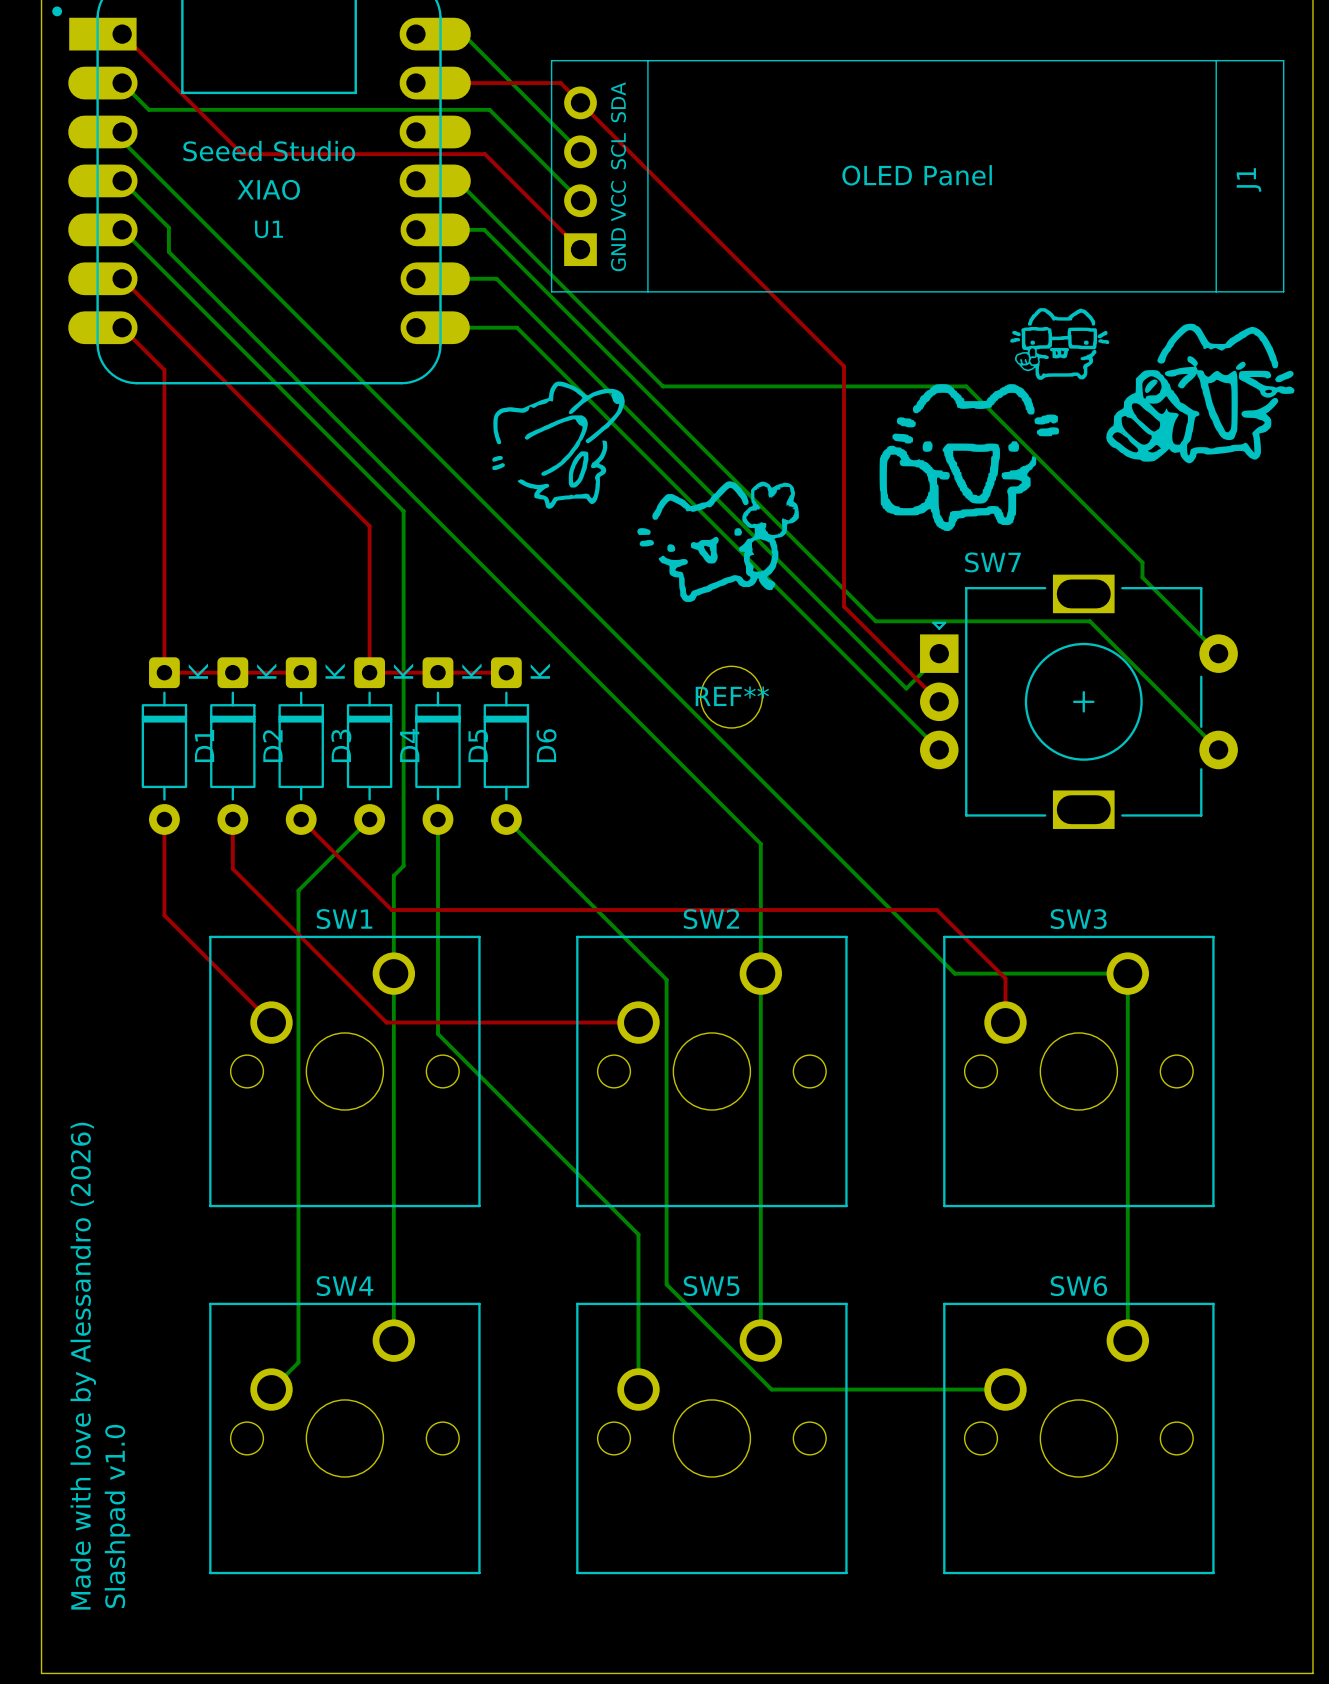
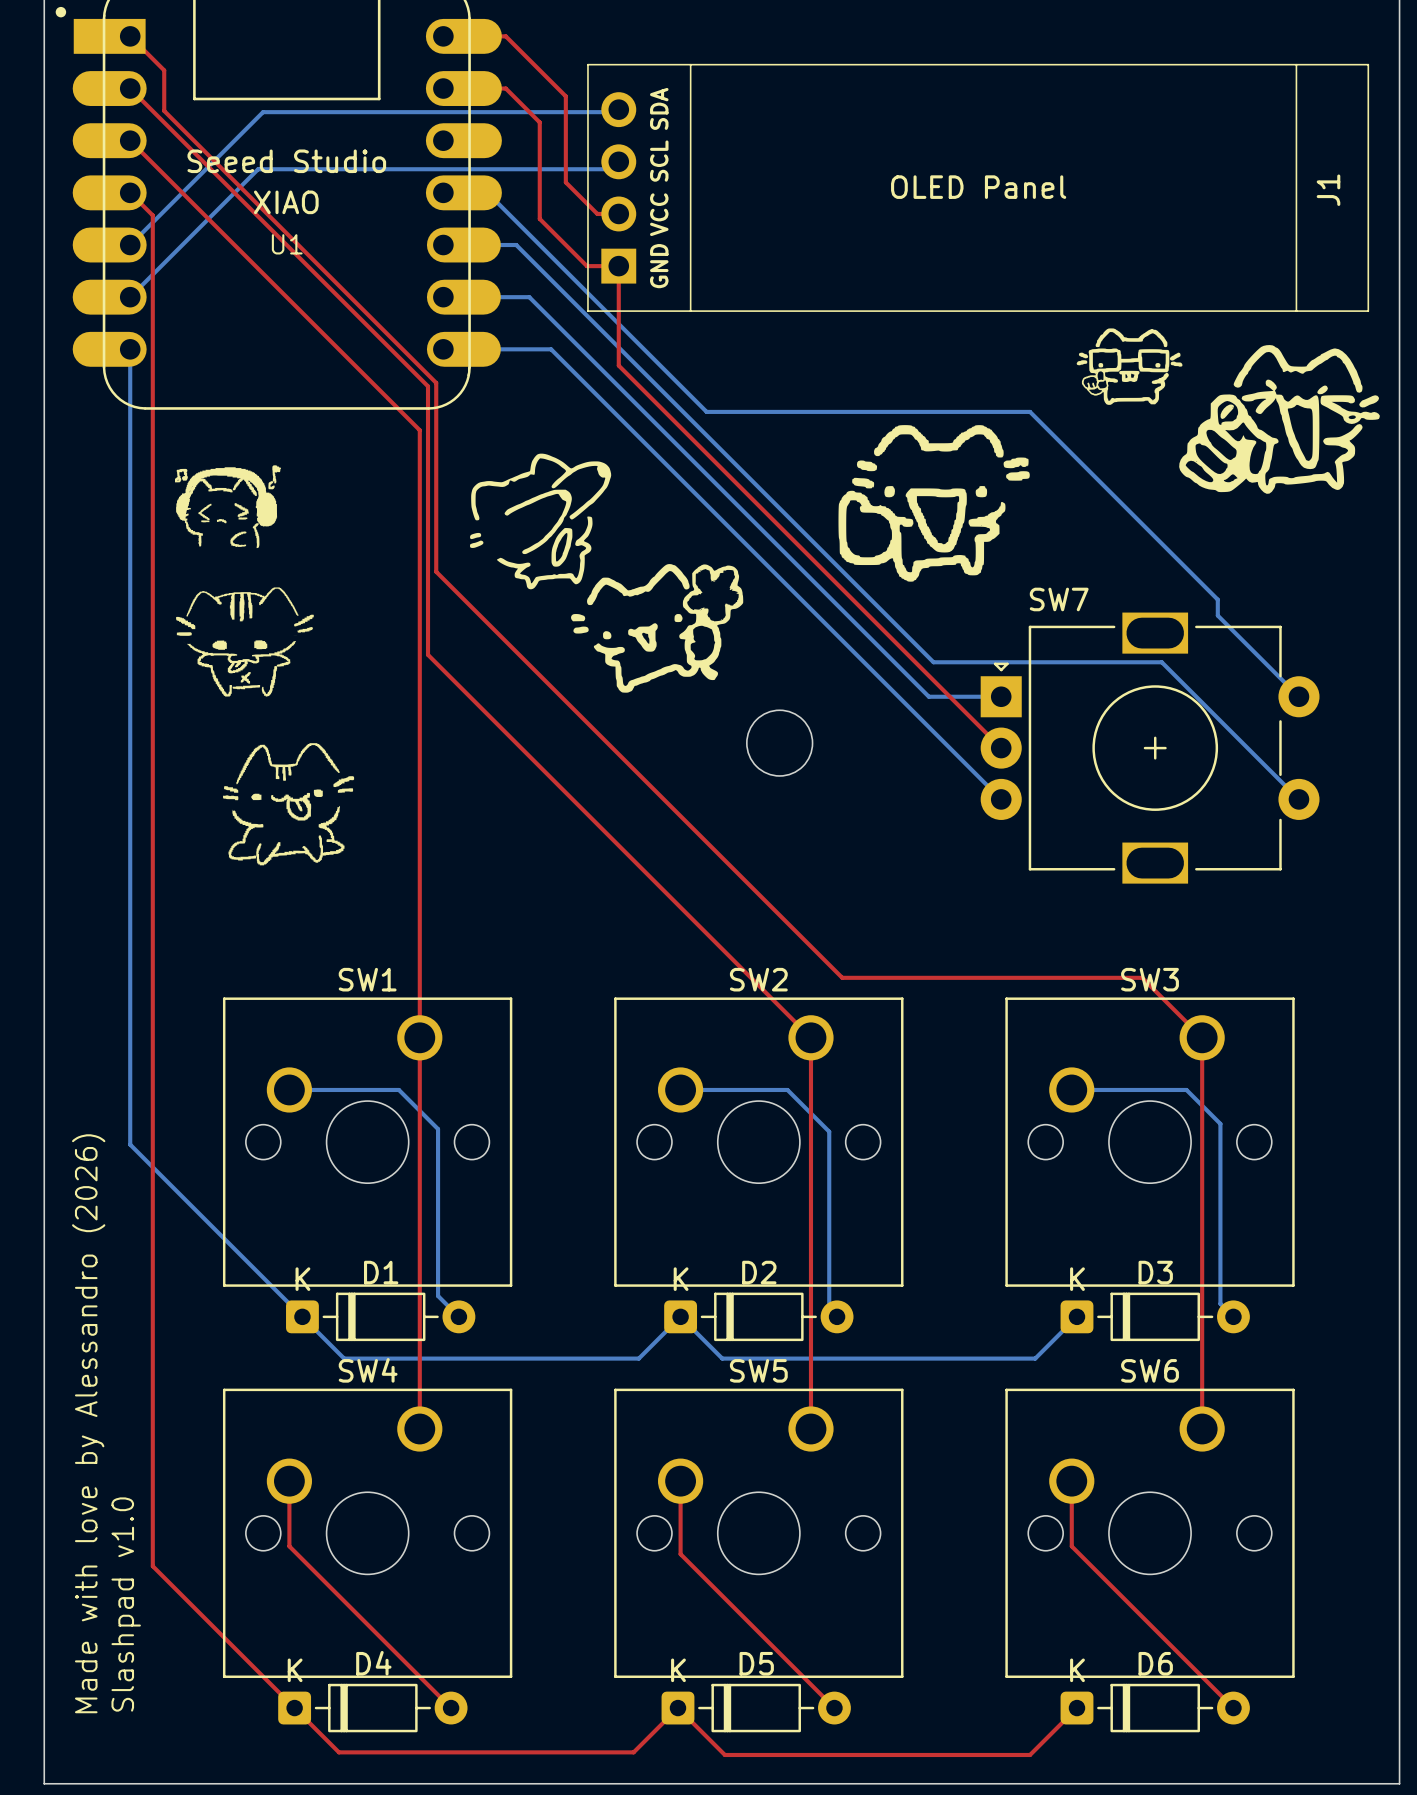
top track: none -> (443, 36) (505, 36) (565, 96) (565, 182) (597, 213) (618, 213)
bottom track: (415, 34) (462, 34) (580, 151) -> (130, 297) (258, 169) (611, 169) (618, 161)
top track: (154, 66) (242, 154) (484, 154) (580, 249) -> (164, 70) (164, 110) (436, 382) (436, 571) (842, 977) (1142, 977) (1202, 1037) (1202, 1429)
top track: none -> (130, 88) (428, 386) (428, 654) (810, 1037) (810, 1429)
bottom track: (122, 83) (148, 109) (489, 109) (580, 200) -> none
top track: (474, 83) (560, 83) (844, 366) (844, 606) -> (505, 88) (539, 122) (539, 218) (586, 266) (618, 266) (618, 365) (899, 646)
top track: none -> (130, 140) (419, 430) (419, 1429)
bottom track: (122, 131) (122, 140) (954, 973) (1127, 973) (1127, 1340) -> none
top track: none -> (130, 192) (152, 215) (152, 1566) (338, 1752) (633, 1752) (677, 1708) (724, 1754) (1030, 1754) (1076, 1708)
bottom track: (122, 180) (168, 227) (168, 252) (760, 843) (760, 1340) -> none
bottom track: (122, 229) (403, 511) (403, 865) (393, 875) (393, 1340) -> (130, 245) (263, 112) (616, 112) (618, 109)
top track: (122, 278) (369, 526) (369, 672) (506, 672) -> none
top track: (122, 327) (164, 369) (164, 672) (301, 672) -> none
bottom track: none -> (130, 349) (130, 1144) (344, 1358) (638, 1358) (680, 1316) (722, 1358) (1035, 1358) (1076, 1316)
drawing: none -> [175, 465, 281, 549]
drawing position: (558, 445) -> (540, 521)
drawing position: (969, 457) -> (934, 503)
drawing position: (718, 541) -> (657, 628)
drawing: none -> [176, 587, 314, 697]
bottom track: (871, 653) (906, 688) (941, 653) (939, 653) -> (928, 696) (1001, 696)
REF** name: REF** (732, 696) -> none
drawing: none -> [223, 743, 355, 866]
D1 rotation: 0° (164, 746) -> 90° counterclockwise (380, 1316)
D1 position: (164, 746) -> (380, 1316)
D2 rotation: 0° (232, 746) -> 90° counterclockwise (758, 1316)
D2 position: (232, 746) -> (758, 1316)
D3 rotation: 0° (301, 746) -> 90° counterclockwise (1155, 1316)
D3 position: (301, 746) -> (1155, 1316)
D4 rotation: 0° (369, 746) -> 90° counterclockwise (372, 1708)
D4 position: (369, 746) -> (372, 1708)
D5 rotation: 0° (437, 746) -> 90° counterclockwise (756, 1708)
D5 position: (437, 746) -> (756, 1708)
D6 rotation: 0° (506, 746) -> 90° counterclockwise (1155, 1708)
D6 position: (506, 746) -> (1155, 1708)
top track: (164, 819) (164, 915) (271, 1022) -> none
top track: (232, 819) (232, 868) (386, 1022) (638, 1022) -> none
top track: (301, 819) (391, 910) (936, 910) (1005, 978) (1005, 1022) -> none
bottom track: (369, 819) (298, 890) (298, 1362) (271, 1389) -> none
bottom track: (437, 819) (437, 1034) (638, 1234) (638, 1389) -> none
bottom track: (506, 819) (666, 979) (666, 1284) (771, 1389) (1005, 1389) -> none
bottom track: none -> (289, 1089) (398, 1089) (438, 1129) (438, 1295) (458, 1316)
bottom track: none -> (680, 1089) (787, 1089) (829, 1131) (829, 1309) (837, 1316)
bottom track: none -> (1071, 1089) (1186, 1089) (1220, 1123) (1220, 1303) (1233, 1316)
top track: none -> (289, 1481) (289, 1546) (451, 1708)
top track: none -> (680, 1481) (680, 1554) (834, 1708)
top track: none -> (1071, 1481) (1071, 1546) (1233, 1708)

